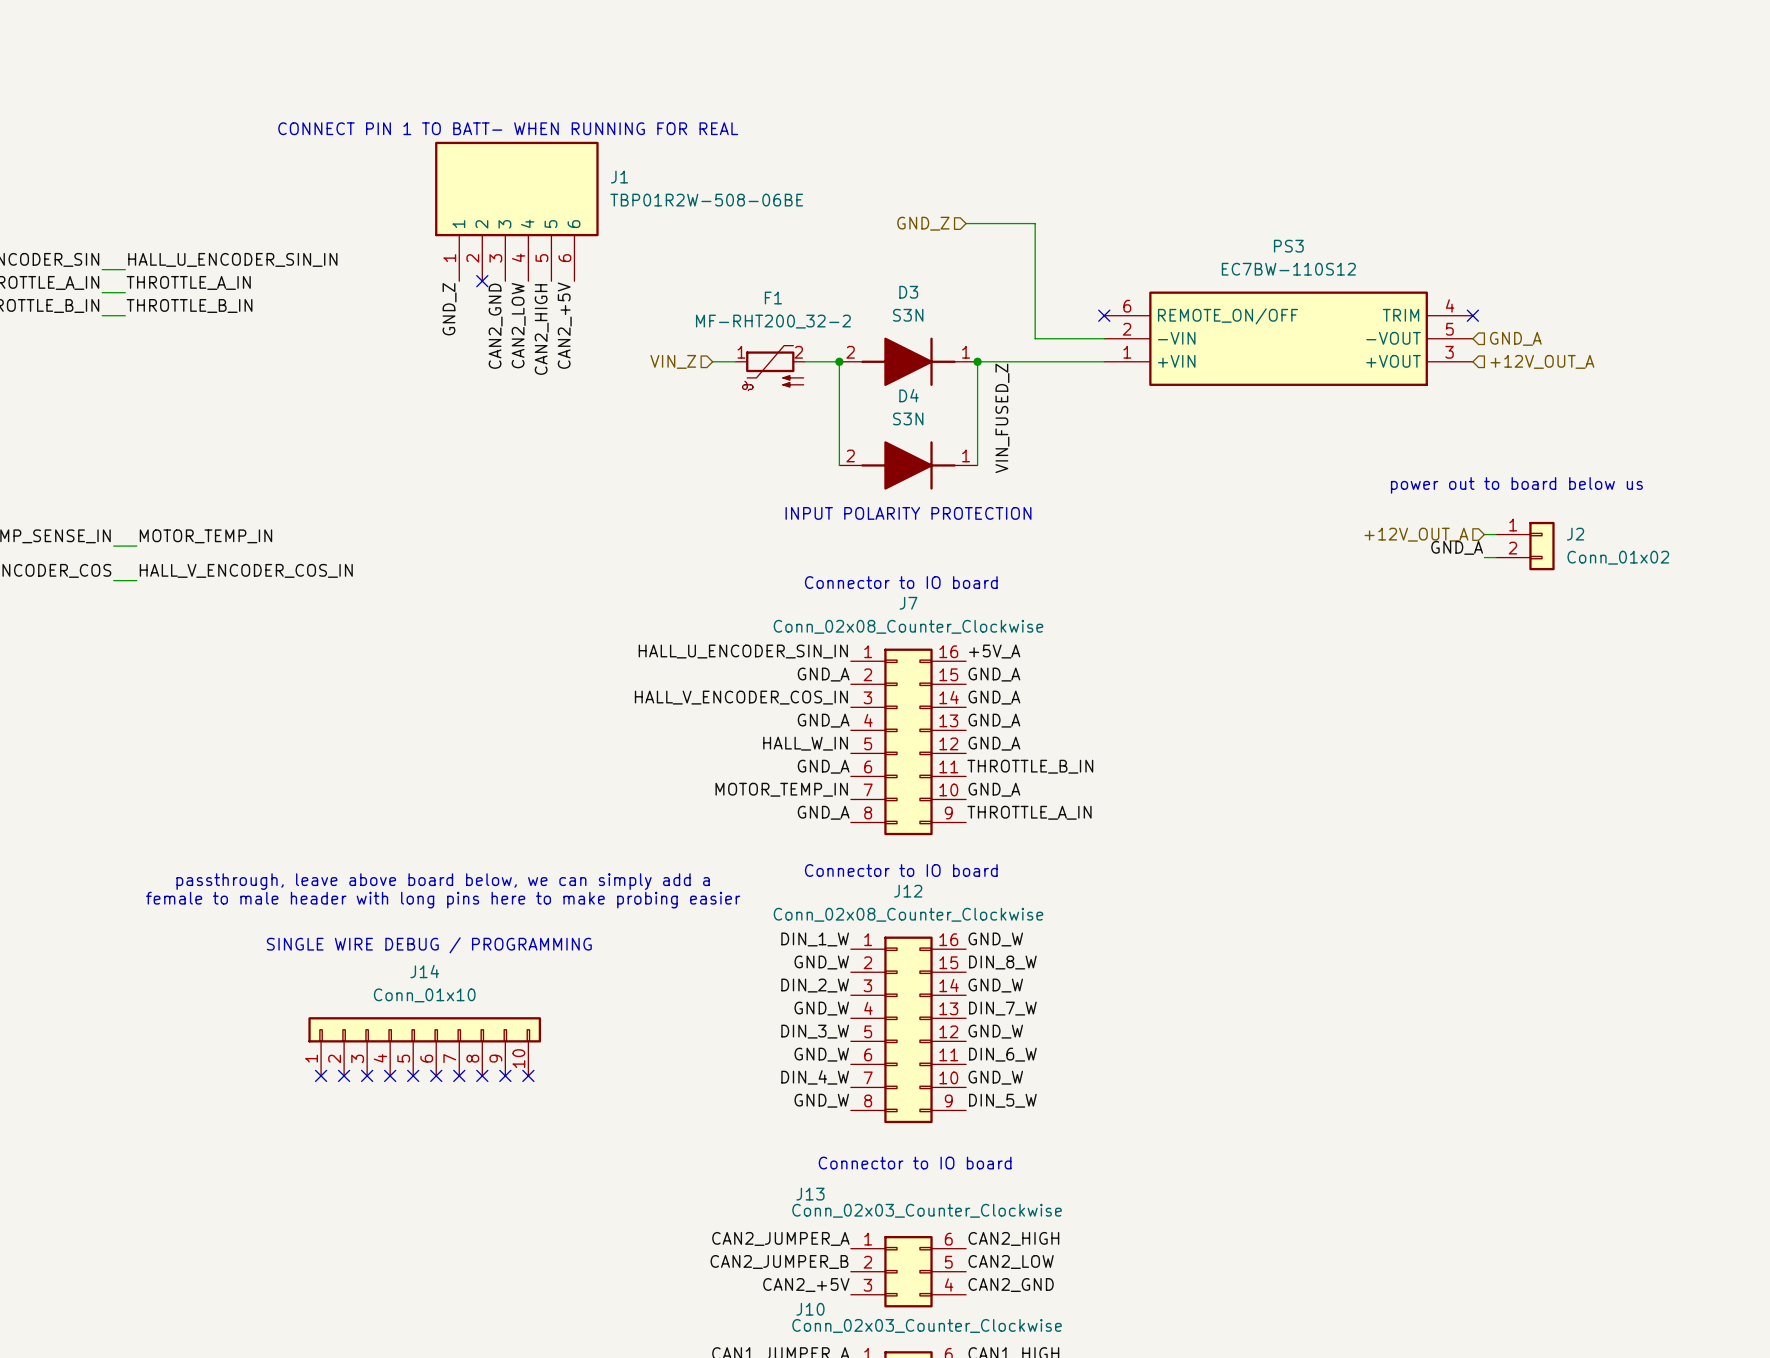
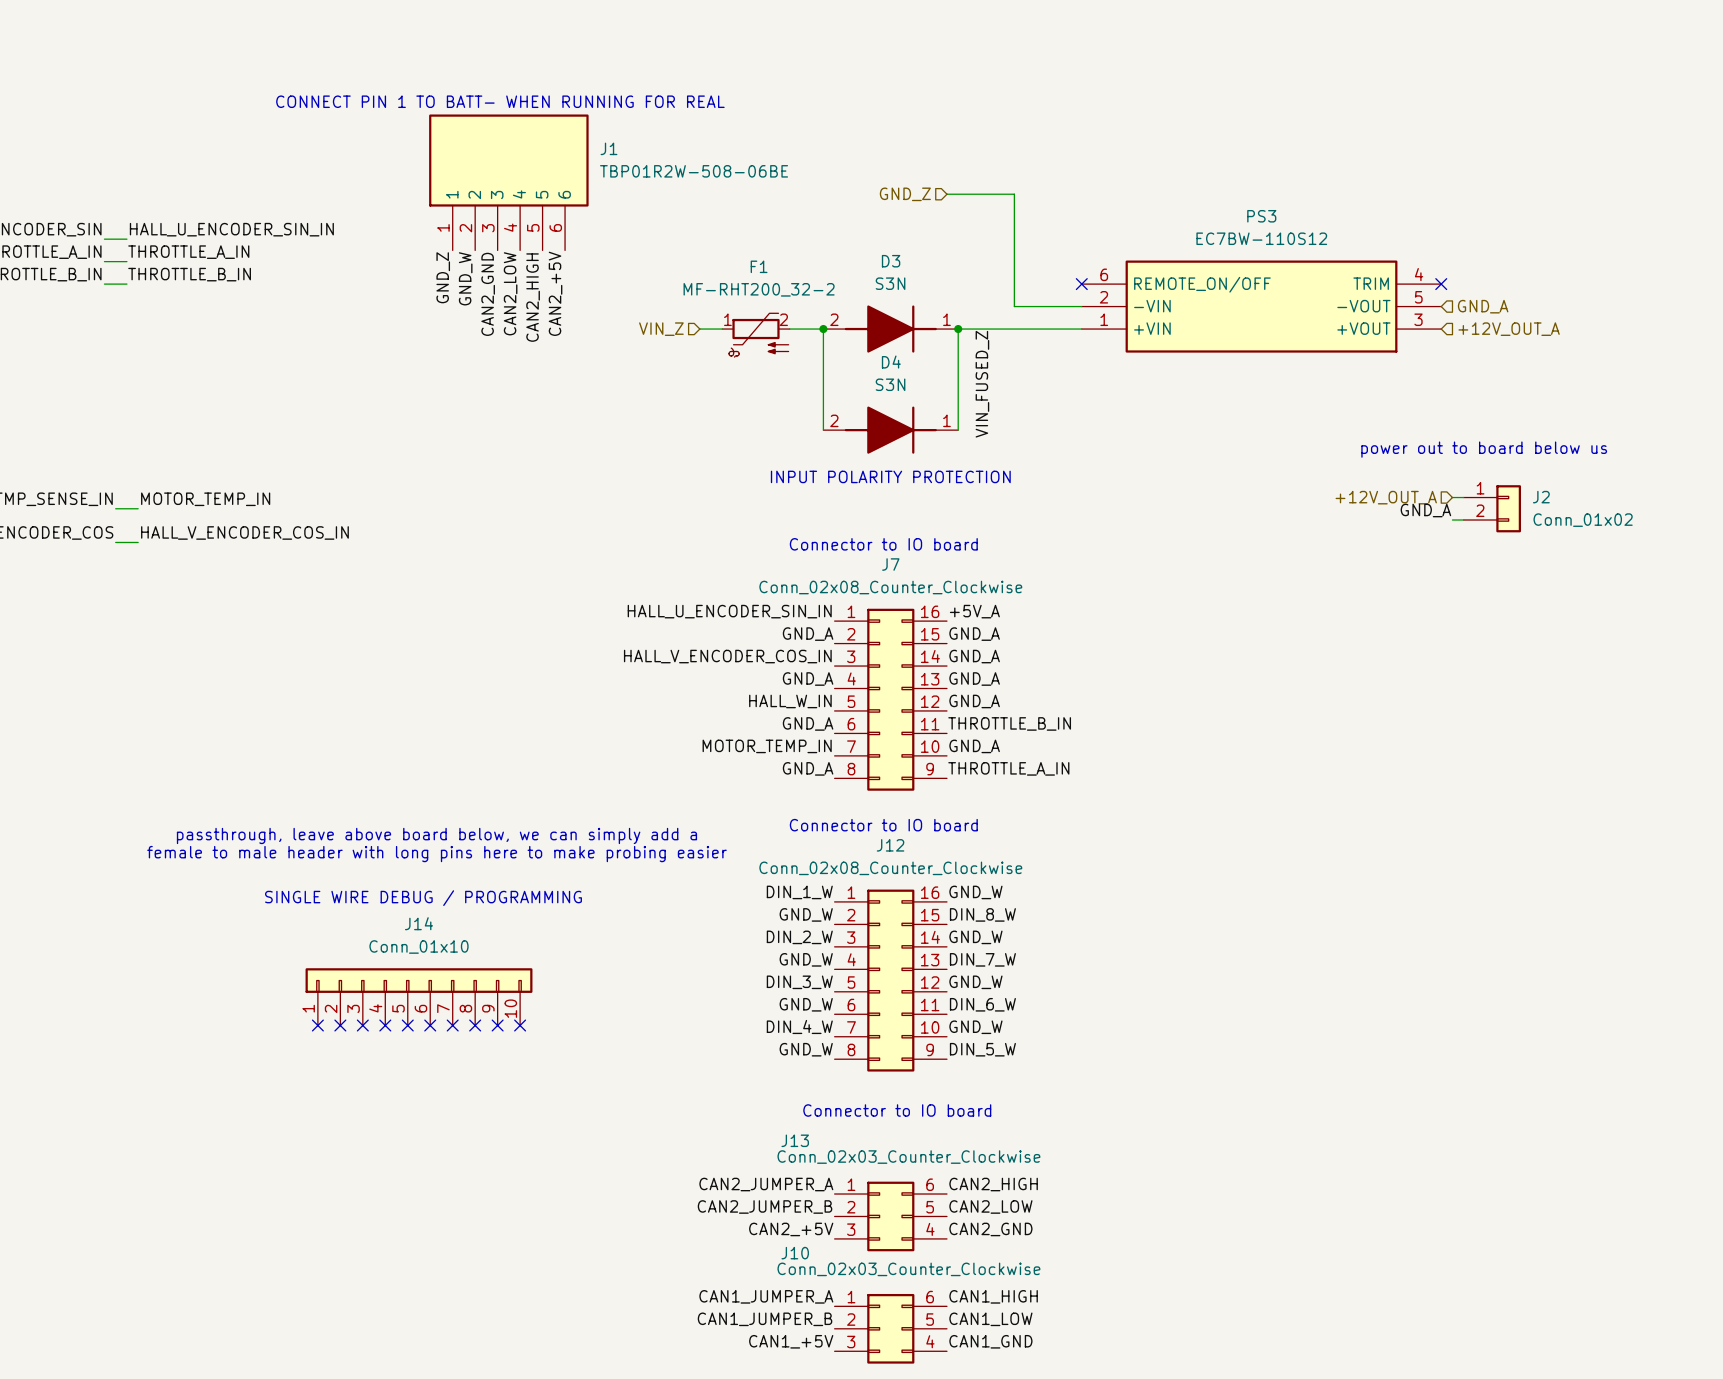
no-connect mark: (482, 281) -> none
label: none -> GND_W (465, 278)

